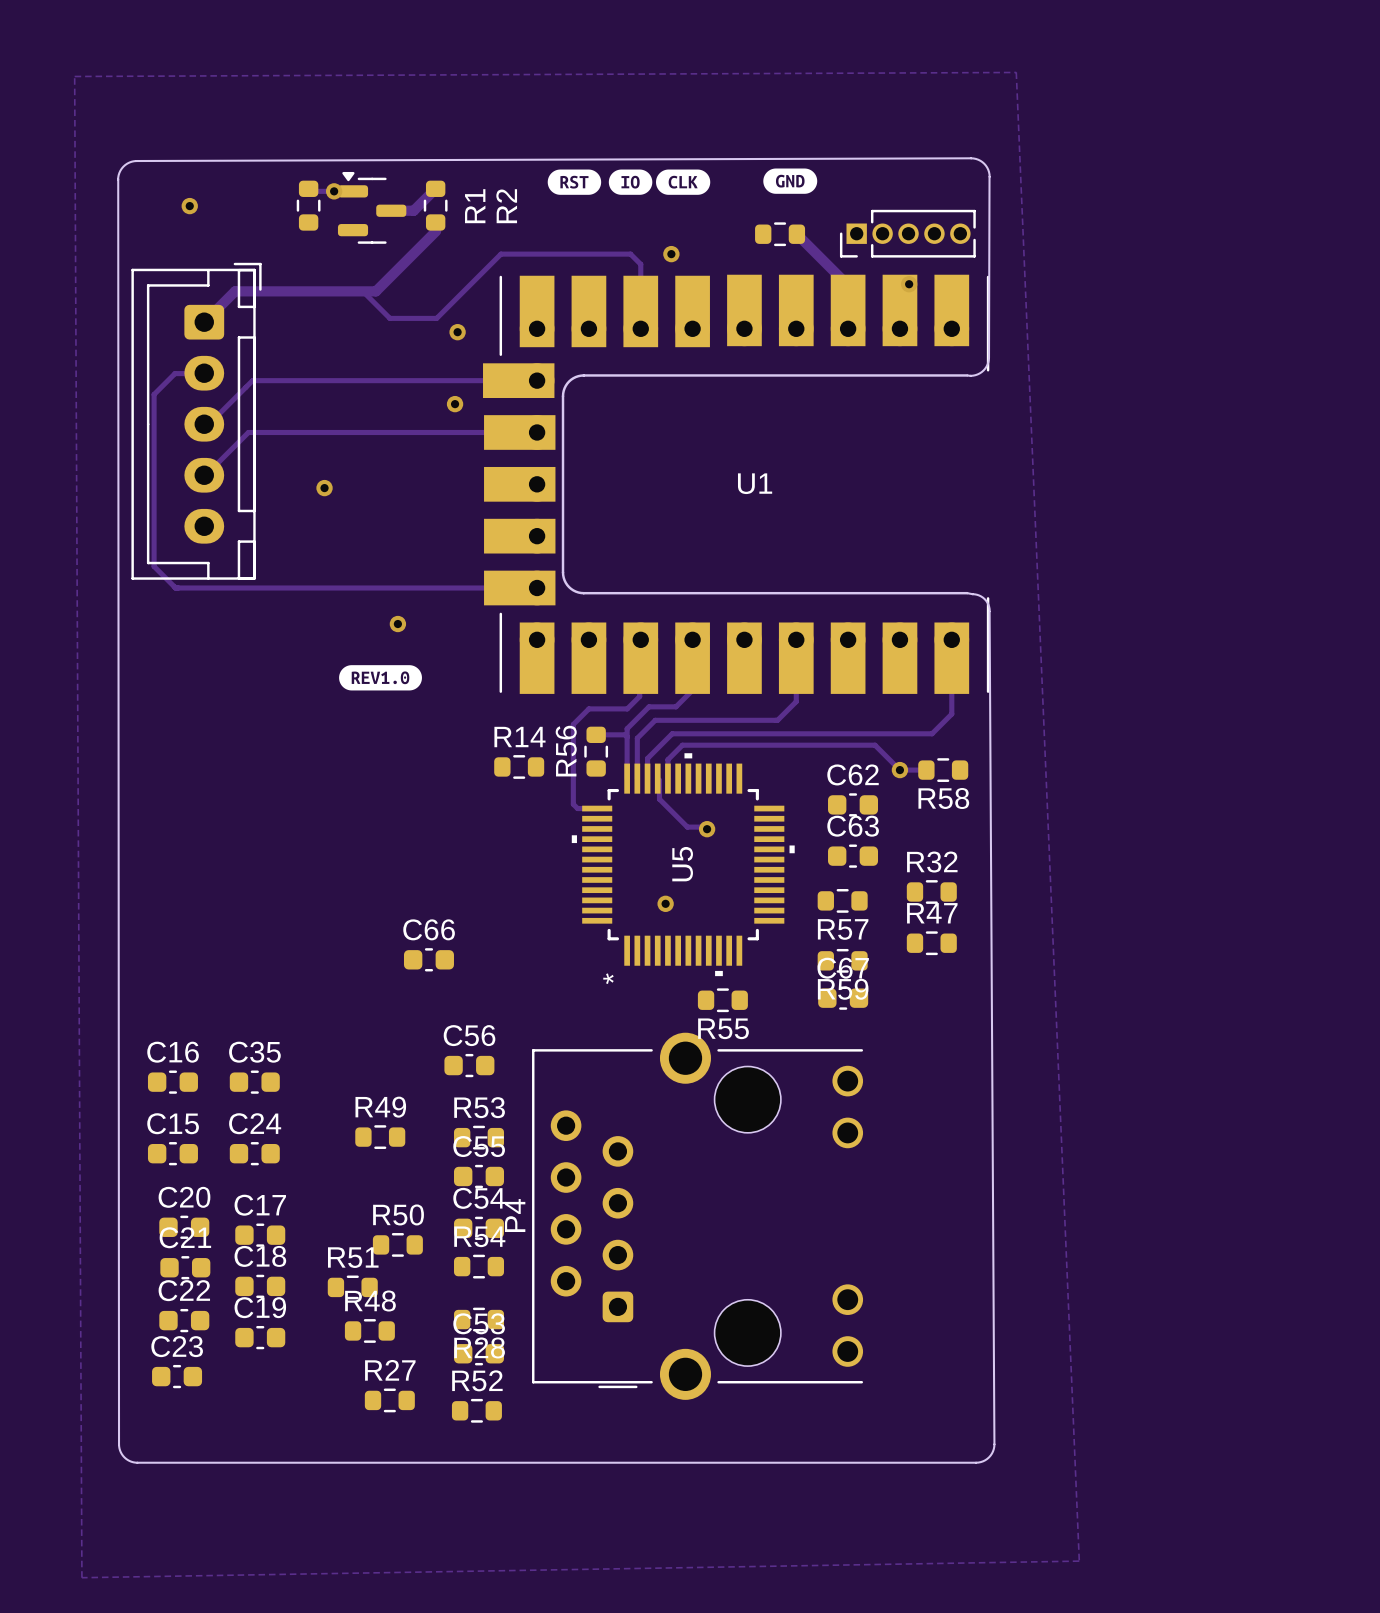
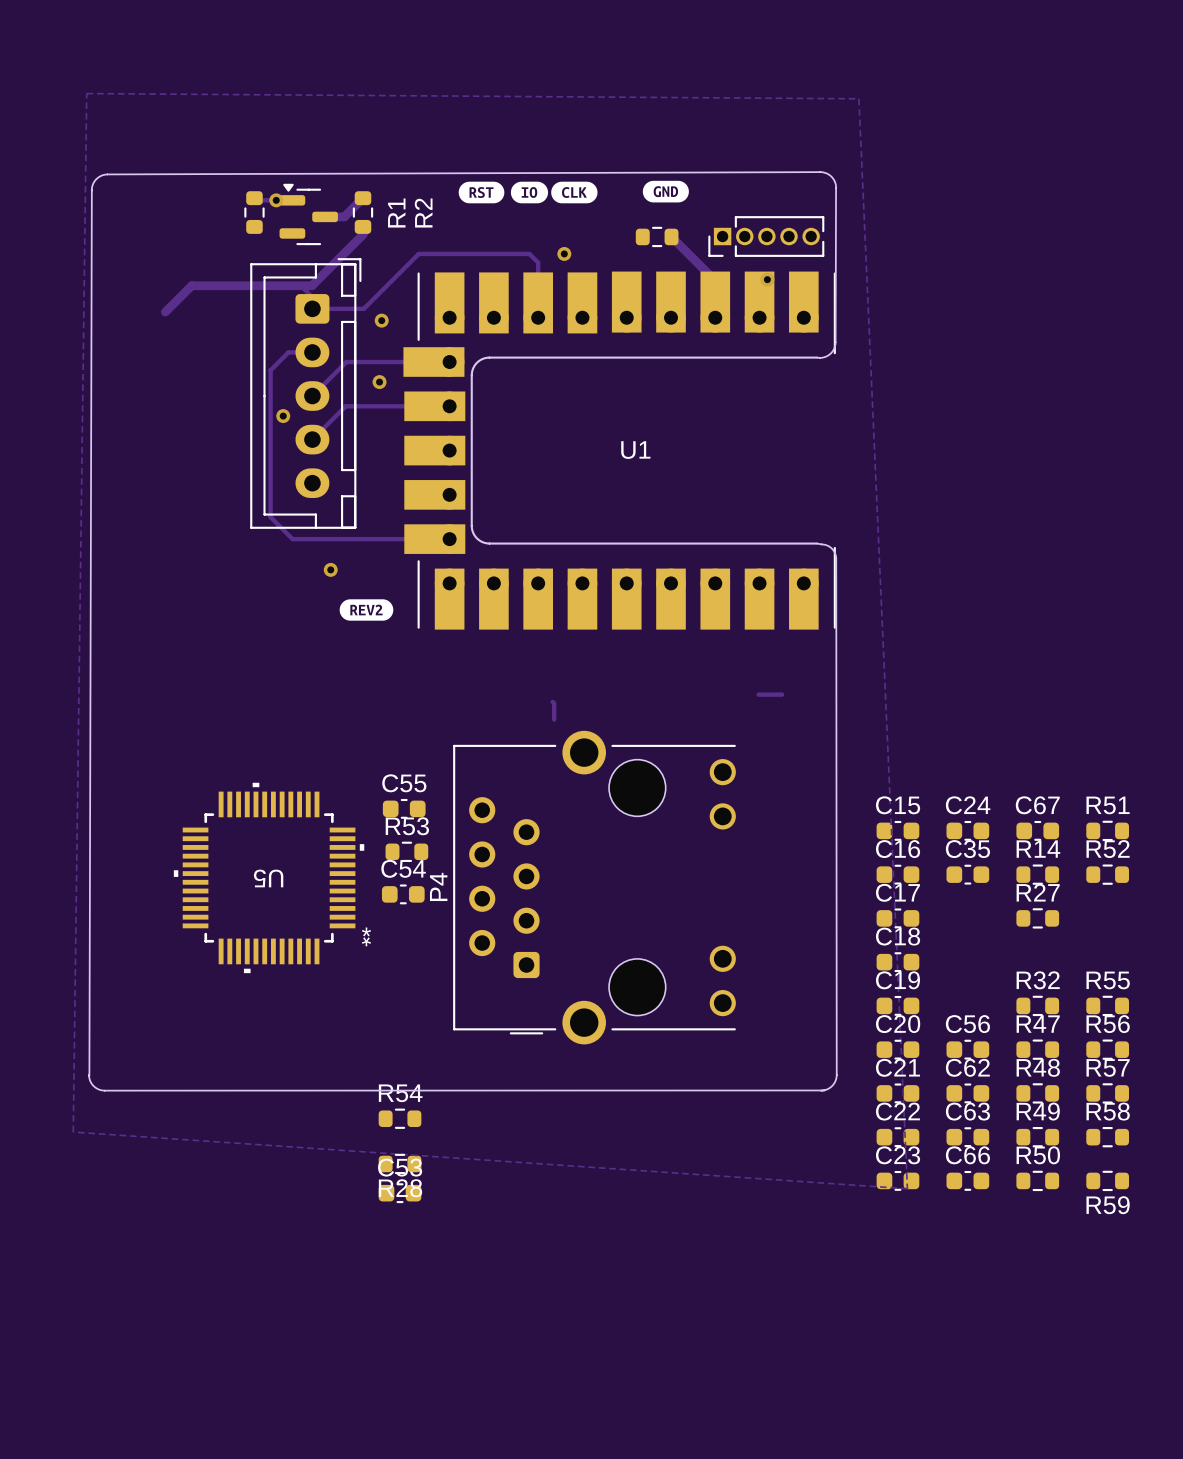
zone outline: (1016, 72) (74, 76) (81, 1577) (1079, 1561) (1016, 72) -> (86, 93) (73, 1132) (907, 1188) (858, 98) (86, 93)
board edge: (118, 179) (119, 1444) (121, 1454) (129, 1460) (137, 1462) (976, 1462) (989, 1457) (994, 1444) (989, 611) -> (91, 189) (89, 1076)
via: (189, 206) -> none
track: (203, 373) (175, 373) (154, 394) (154, 566) (175, 588) (353, 588) -> (312, 352) (288, 352) (270, 370) (270, 517) (292, 539)
track: (416, 380) (252, 380) (206, 427) -> (346, 362) (312, 396)
part position: (196, 421) -> (305, 393)
track: (415, 432) (248, 432) (204, 476) -> (345, 406) (312, 439)
via position: (324, 488) -> (283, 416)
board edge: none -> (836, 559) (836, 1074) (832, 1086) (821, 1090)
drawing: none -> [339, 599, 394, 621]
track: (640, 658) (640, 639) (639, 696) (627, 708) (588, 708) (573, 724) (573, 804) (577, 808) (597, 808) -> none
track: (692, 658) (692, 690) (675, 706) (649, 706) (627, 728) (627, 778) -> none
track: (796, 658) (796, 701) (777, 720) (655, 720) (637, 738) (637, 778) -> none
track: (951, 658) (951, 714) (932, 733) (672, 733) (647, 758) (647, 778) -> none
drawing: [339, 665, 422, 691] -> none
track: (596, 734) (625, 734) (627, 736) -> none
R56 rotation: 0° (596, 751) -> 90° clockwise (1107, 1049)
R56 position: (596, 751) -> (1107, 1049)
R14 position: (519, 766) -> (1037, 874)
track: (899, 770) (875, 745) (682, 745) (667, 759) (667, 778) -> none
via: (899, 770) -> none
R58 position: (943, 770) -> (1107, 1137)
R58 name position: R58 (943, 798) -> R58 (1108, 1111)
track: (659, 799) (687, 827) (705, 827) (707, 829) -> none
C62 position: (853, 804) -> (967, 1093)
via: (707, 829) -> none
C63 position: (853, 856) -> (967, 1137)
U5 rotation: 0° (683, 864) -> 90° counterclockwise (269, 877)
U5 position: (683, 864) -> (269, 877)
R32 position: (931, 891) -> (1037, 1005)
R57 position: (842, 900) -> (1107, 1093)
via: (665, 903) -> none
R57 name position: R57 (843, 929) -> R57 (1108, 1067)
R47 position: (931, 943) -> (1037, 1049)
C66 position: (428, 959) -> (967, 1180)
R59 position: (842, 960) -> (1107, 1180)
C67 position: (843, 998) -> (1037, 830)
R55 position: (722, 1000) -> (1107, 1005)
R55 name position: R55 (723, 1028) -> R55 (1108, 980)
C56 position: (469, 1065) -> (967, 1049)
C16 position: (172, 1082) -> (897, 874)
C35 position: (254, 1082) -> (967, 874)
R49 position: (380, 1137) -> (1037, 1137)
R53 position: (479, 1137) -> (406, 851)
C15 position: (172, 1153) -> (897, 830)
C24 position: (254, 1153) -> (967, 830)
C55 position: (479, 1176) -> (404, 808)
board edge: none -> (89, 1074) (93, 1086) (104, 1090) (824, 1090)
P4 position: (697, 1216) -> (594, 887)
C20 position: (184, 1227) -> (897, 1049)
C54 position: (479, 1228) -> (403, 894)
C17 position: (260, 1235) -> (897, 918)
R50 position: (397, 1244) -> (1037, 1180)
C21 position: (185, 1267) -> (897, 1093)
C18 position: (260, 1286) -> (897, 962)
R51 position: (352, 1287) -> (1107, 830)
C22 position: (184, 1320) -> (897, 1137)
R48 position: (369, 1330) -> (1037, 1093)
C19 position: (260, 1337) -> (897, 1005)
C23 position: (177, 1376) -> (897, 1180)
R27 position: (389, 1400) -> (1037, 918)
R52 position: (476, 1410) -> (1107, 874)

